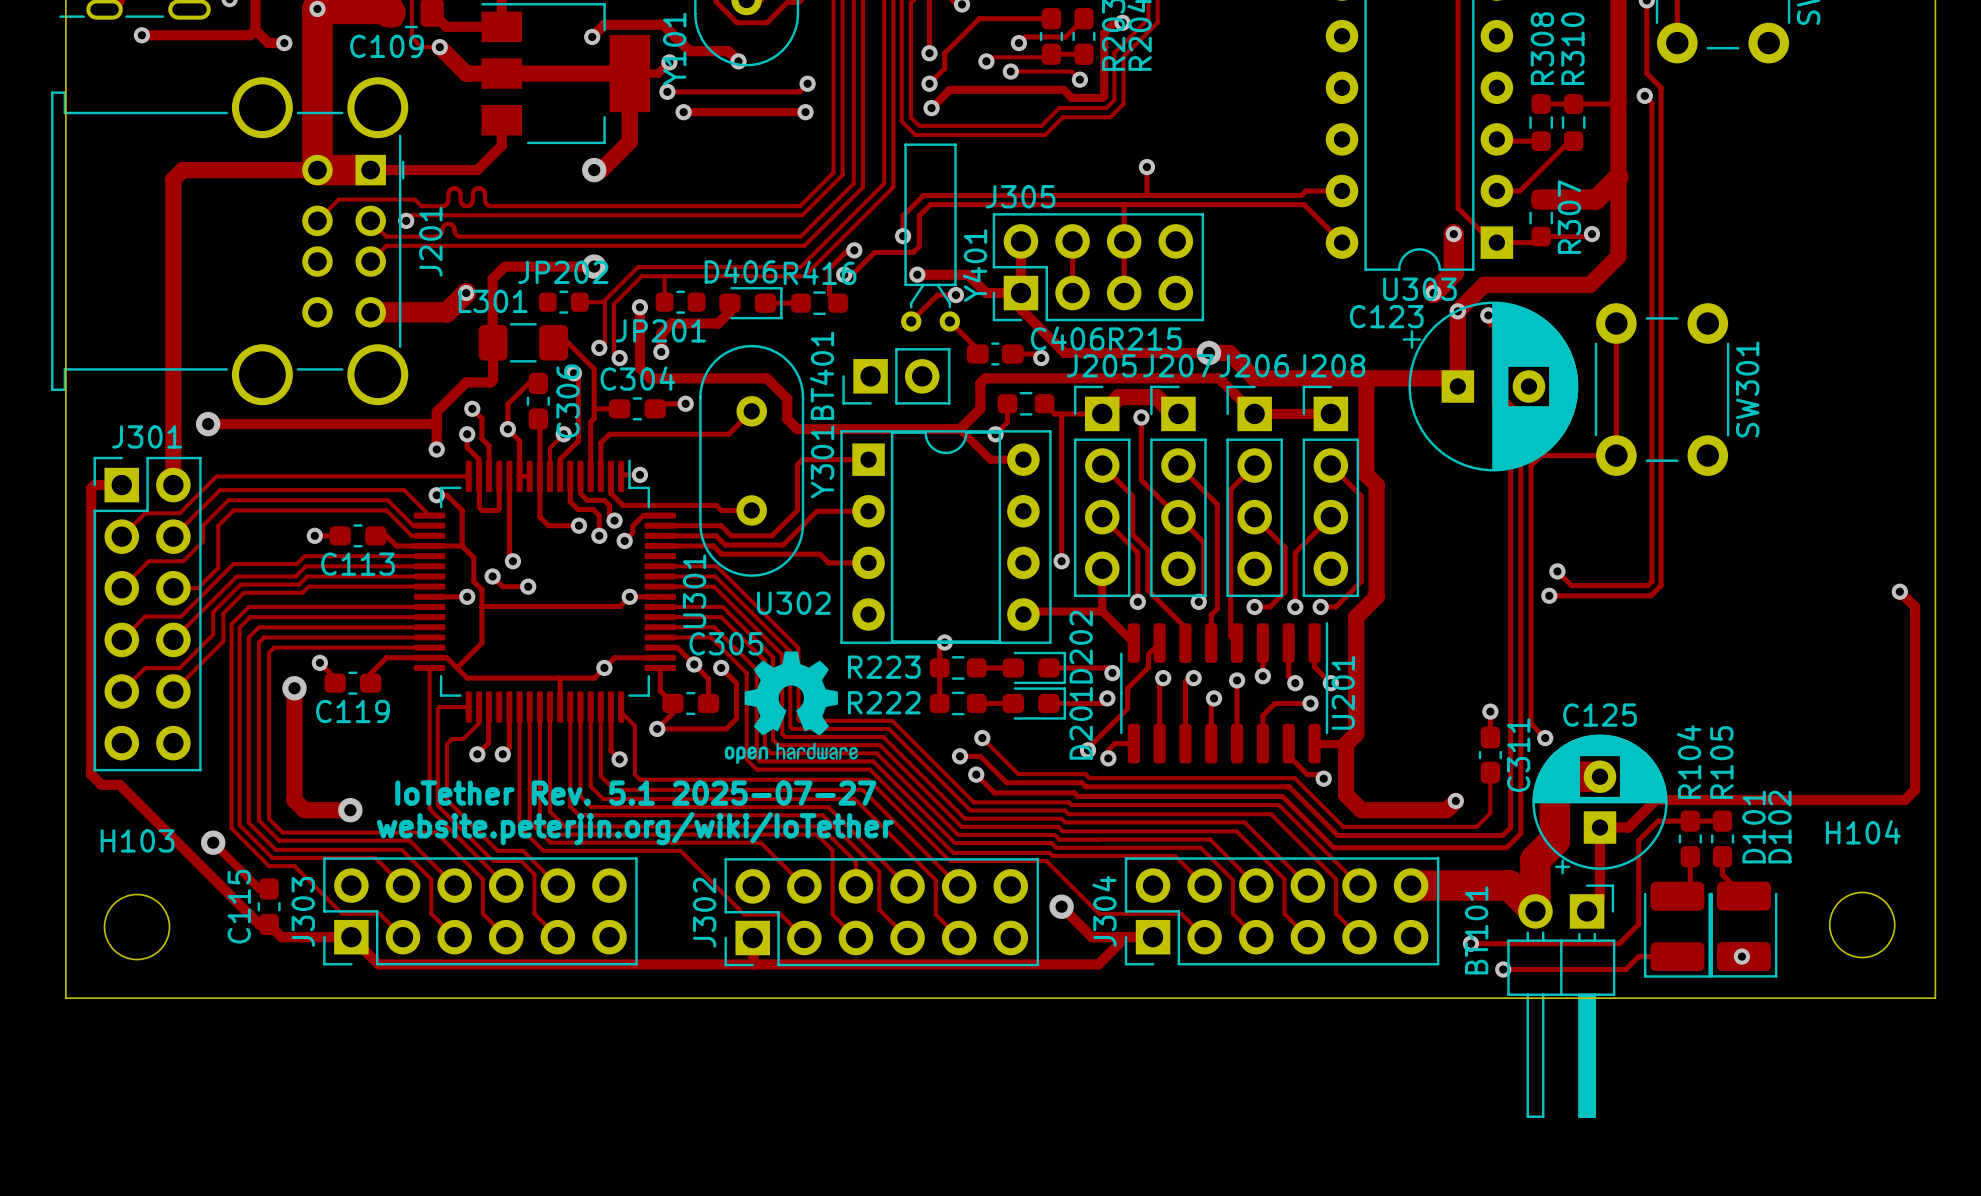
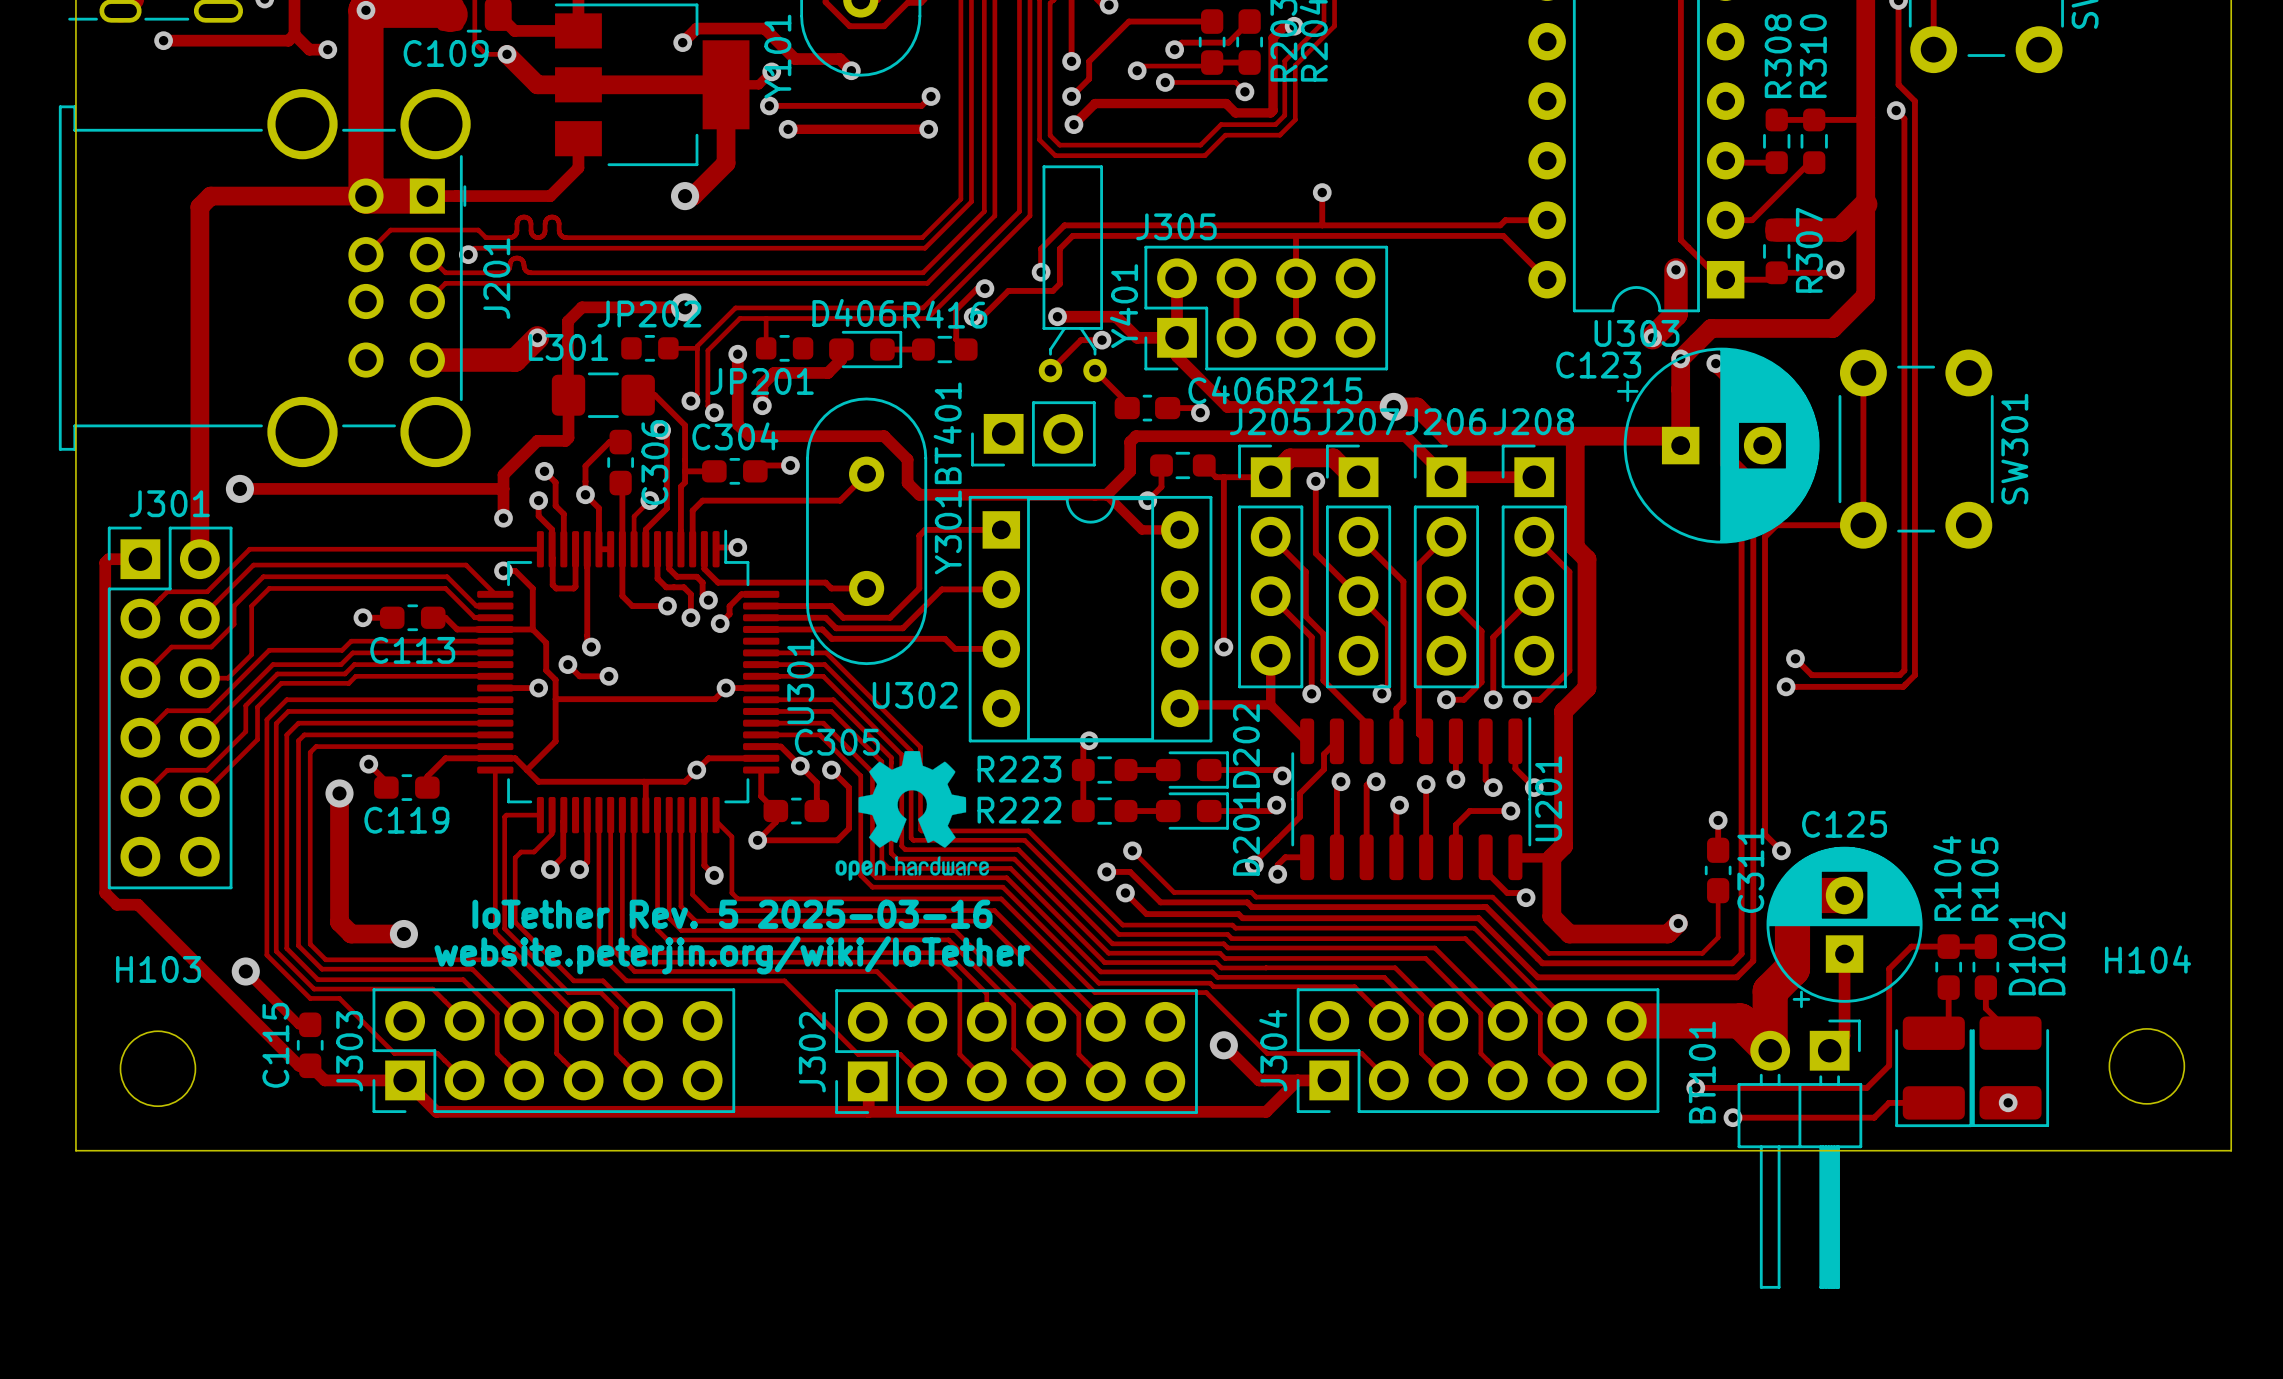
track: (1899, 591) (1915, 606) (1915, 789) (1904, 800) (1655, 800) (1628, 827) (1600, 827) -> none
via: (1899, 591) -> none
text: IoTether Rev. 5.1 2025-07-27 (635, 793) -> IoTether Rev. 5 2025-03-16 (732, 914)

